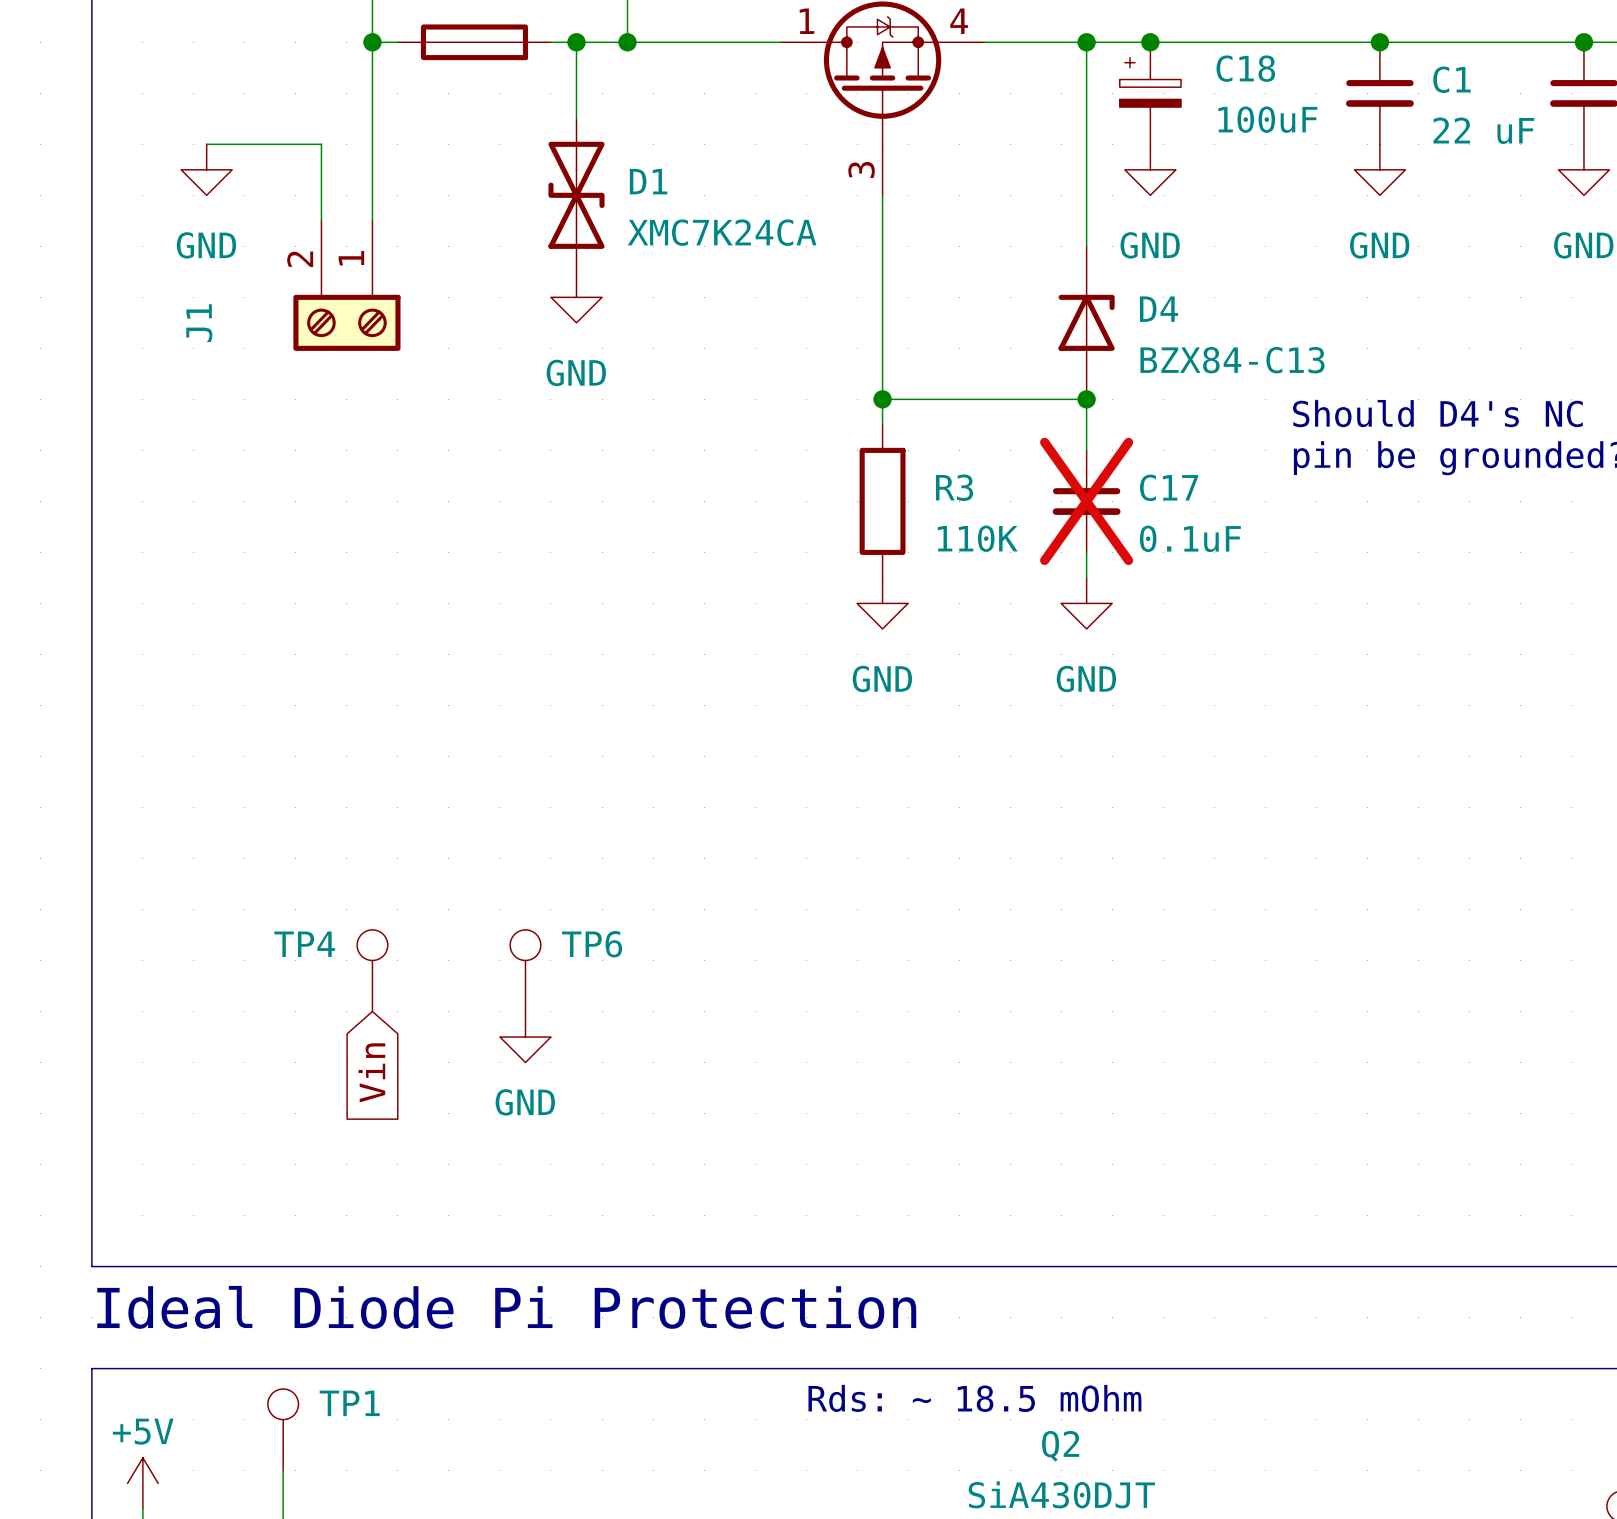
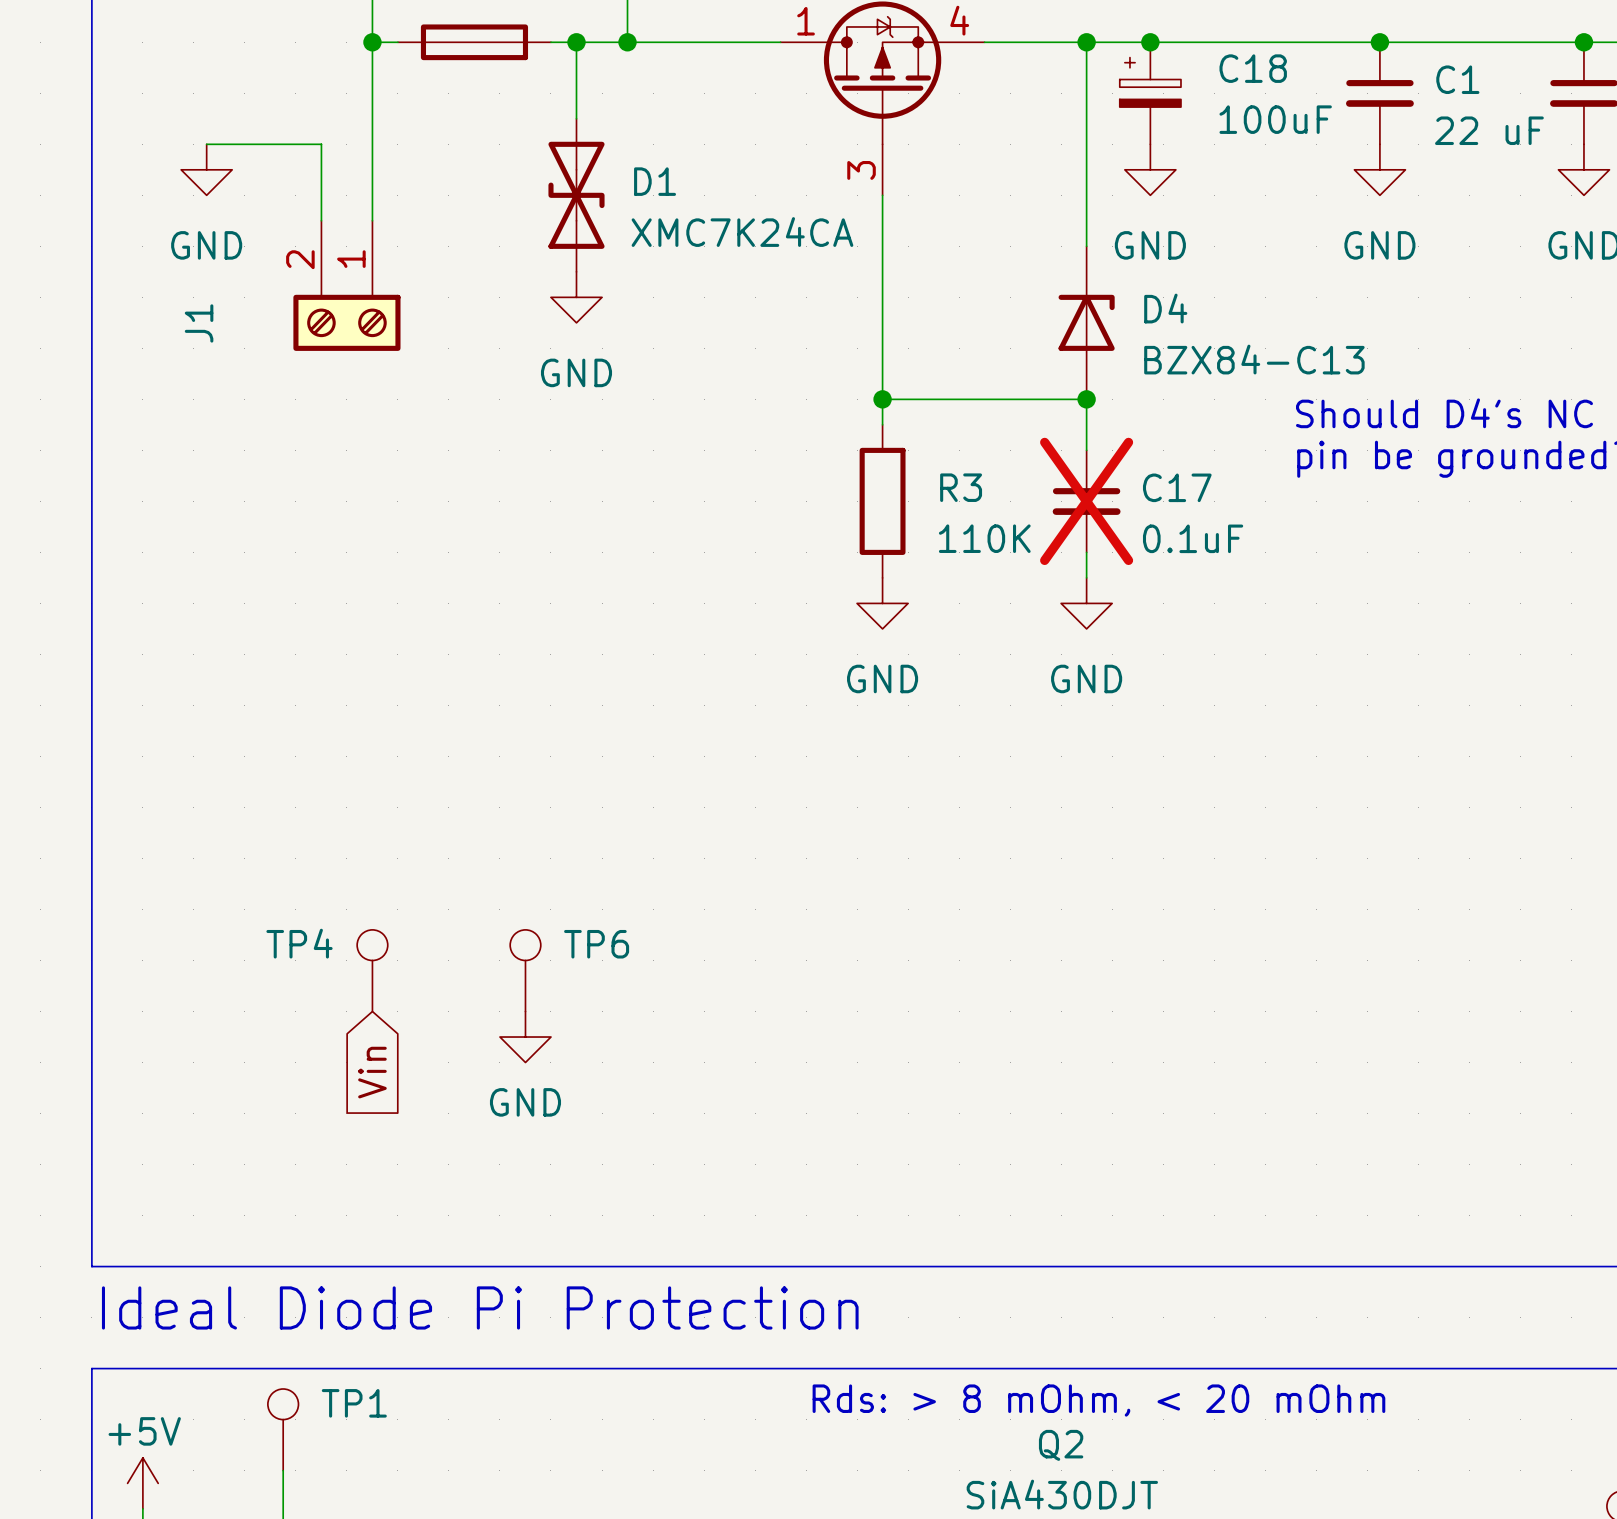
text: Rds: ~ 18.5 mOhm (974, 1398) -> Rds: > 8 mOhm, < 20 mOhm (1098, 1400)

